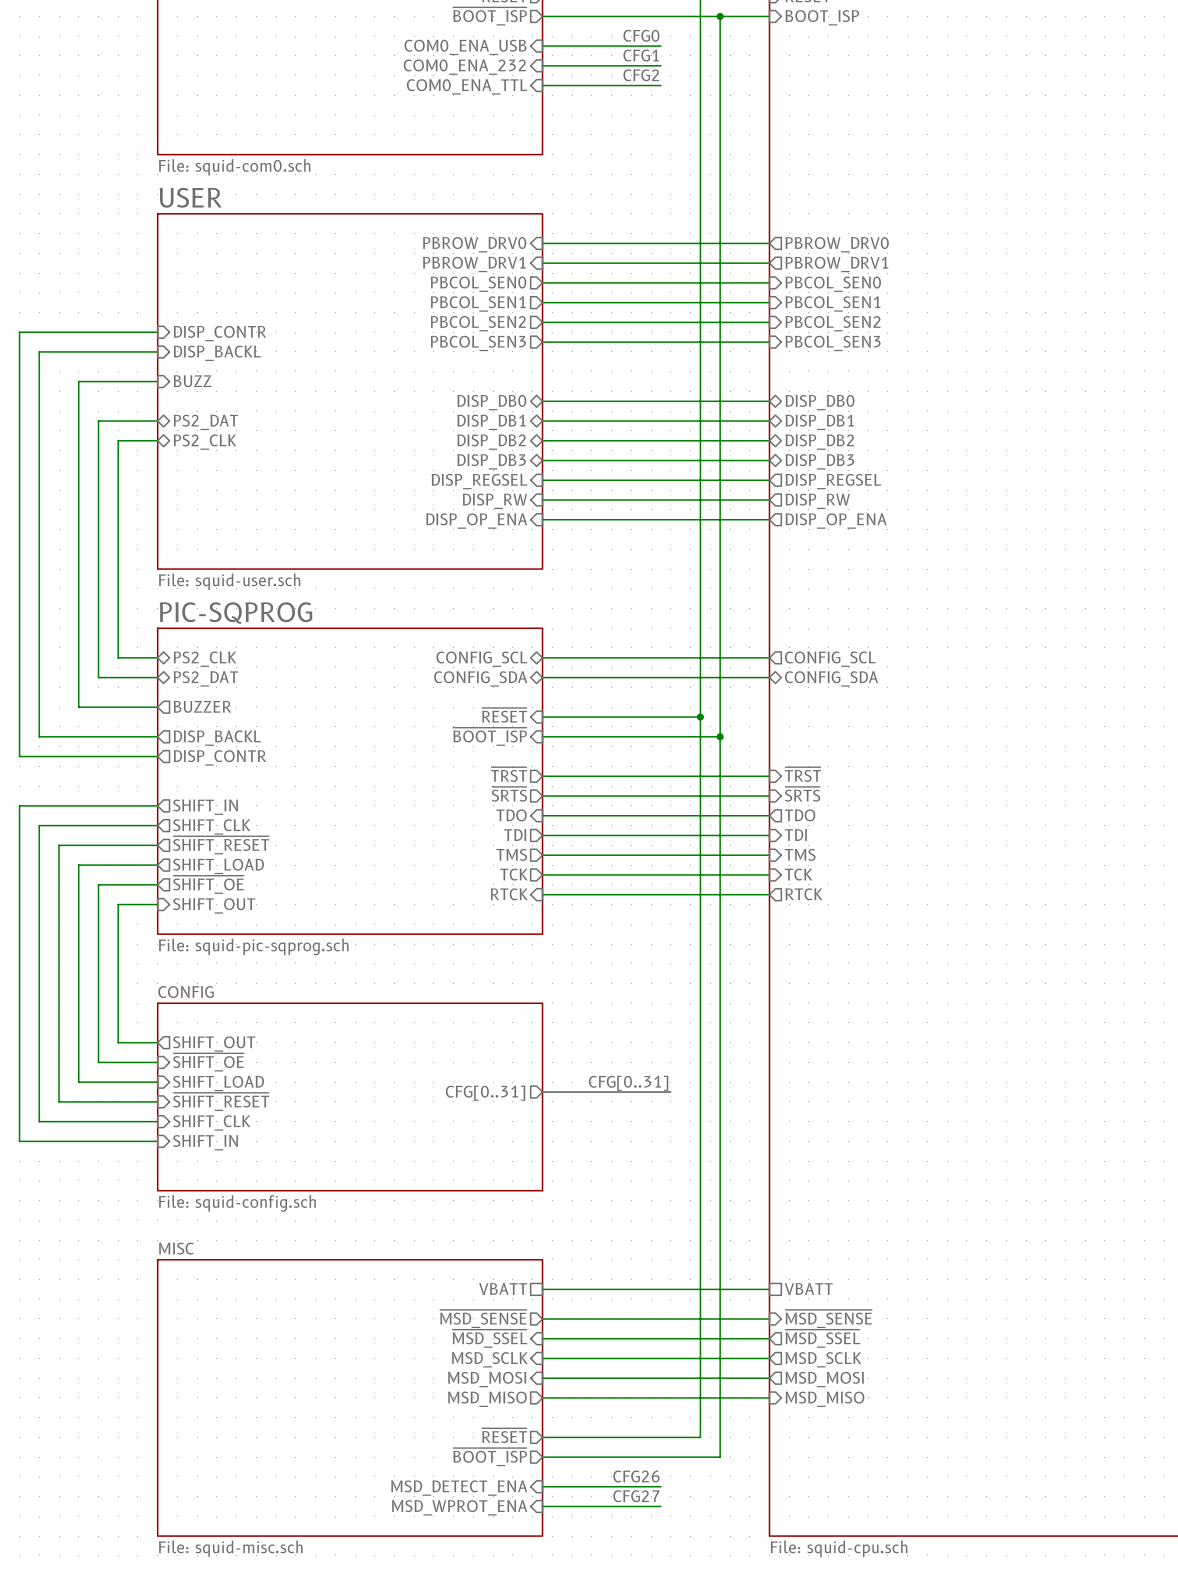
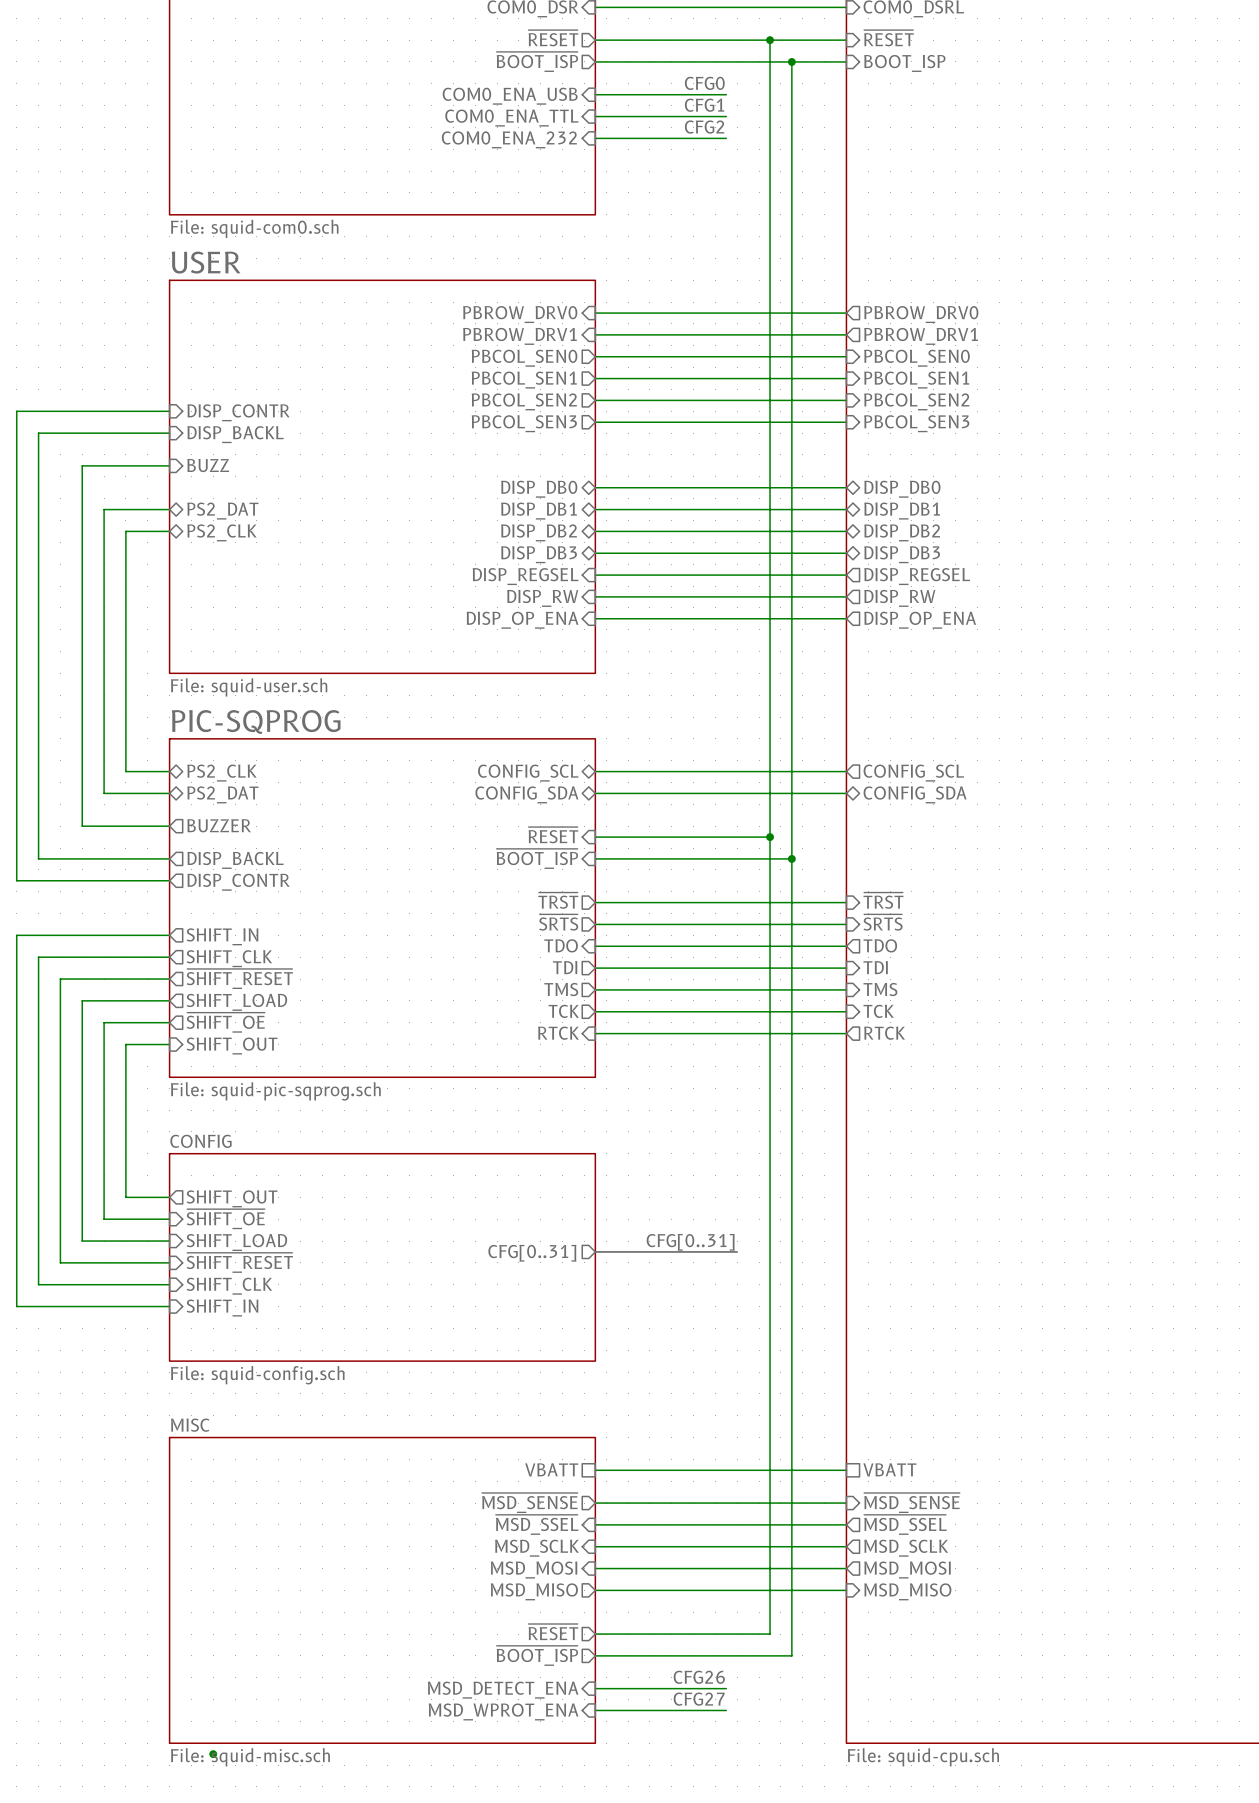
sheet pin: COM0_ENA_232 (464, 67) -> COM0_ENA_TTL (511, 118)
sheet pin: COM0_ENA_TTL (467, 86) -> COM0_ENA_232 (509, 139)
junction: none -> (213, 1754)

